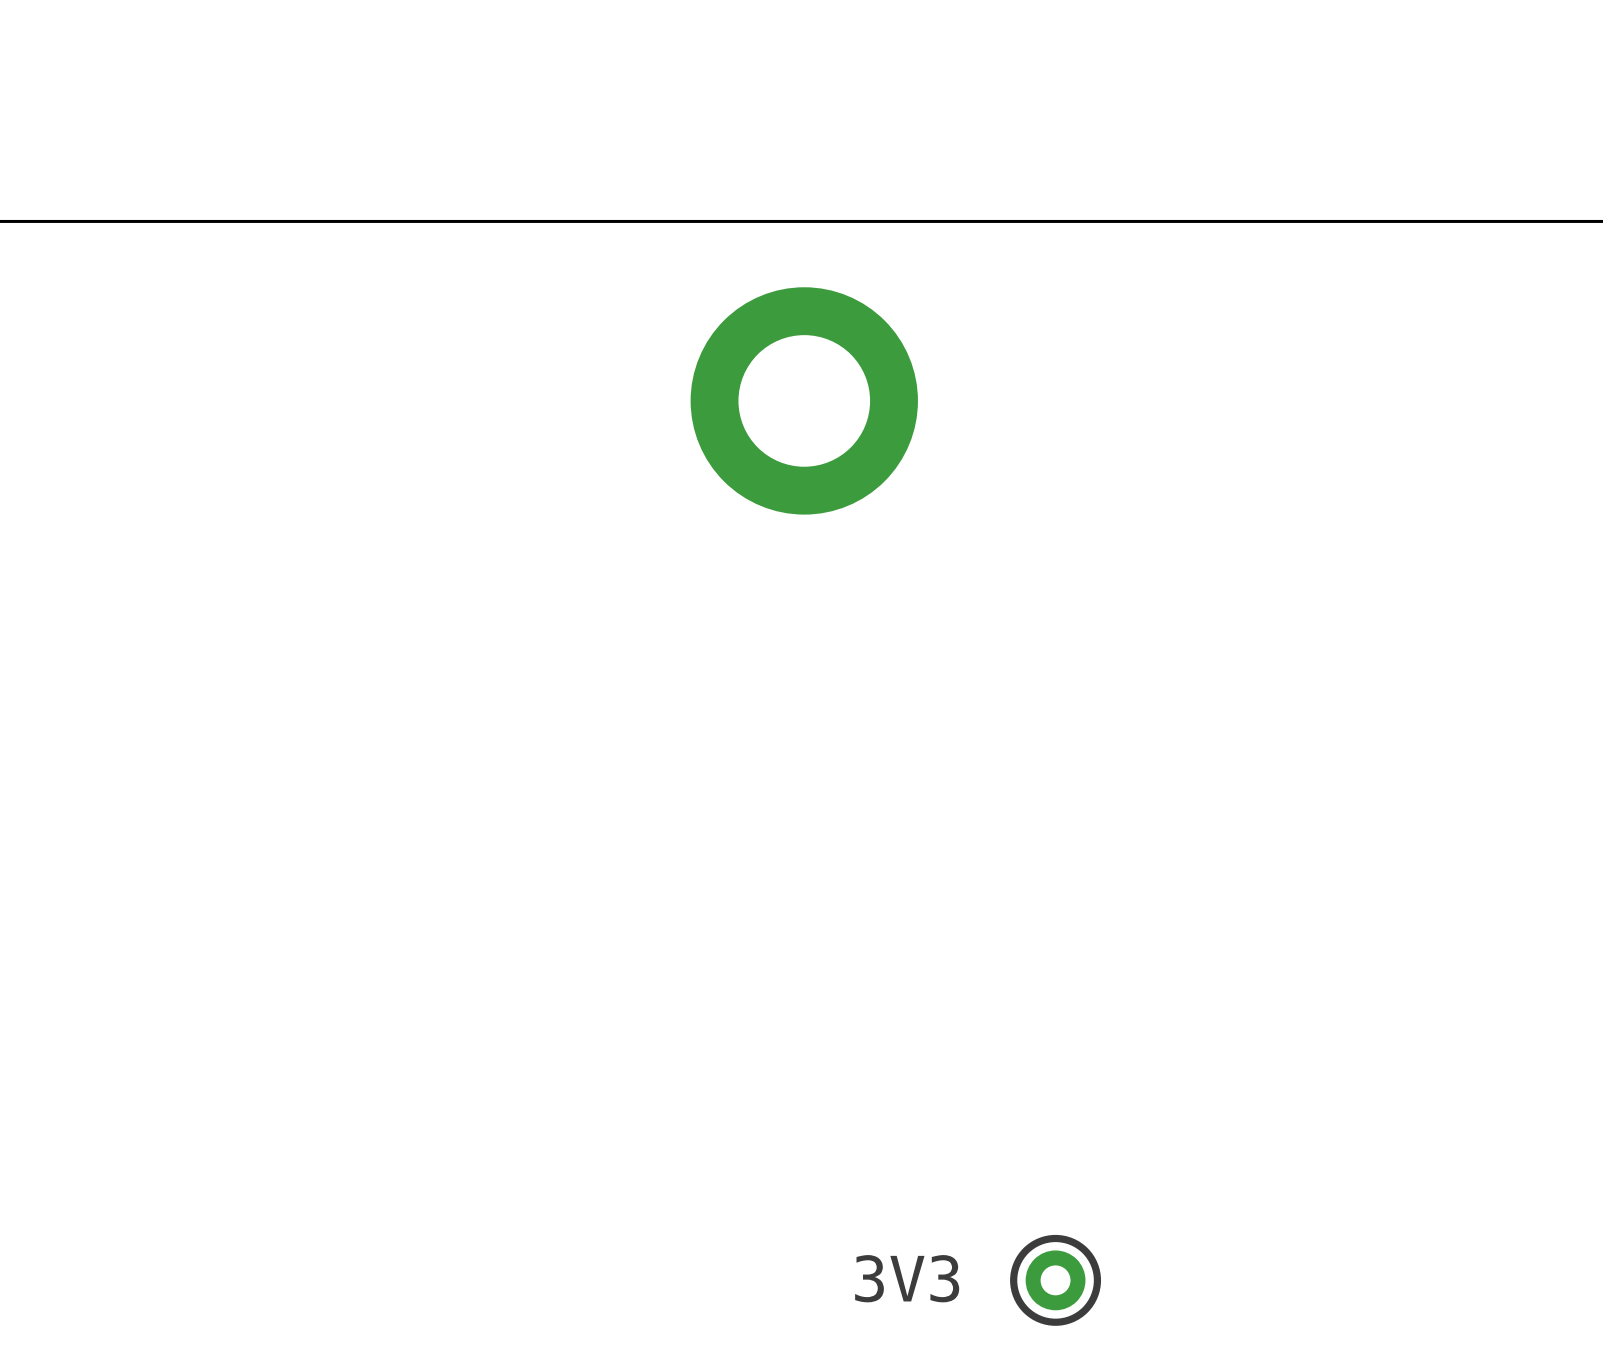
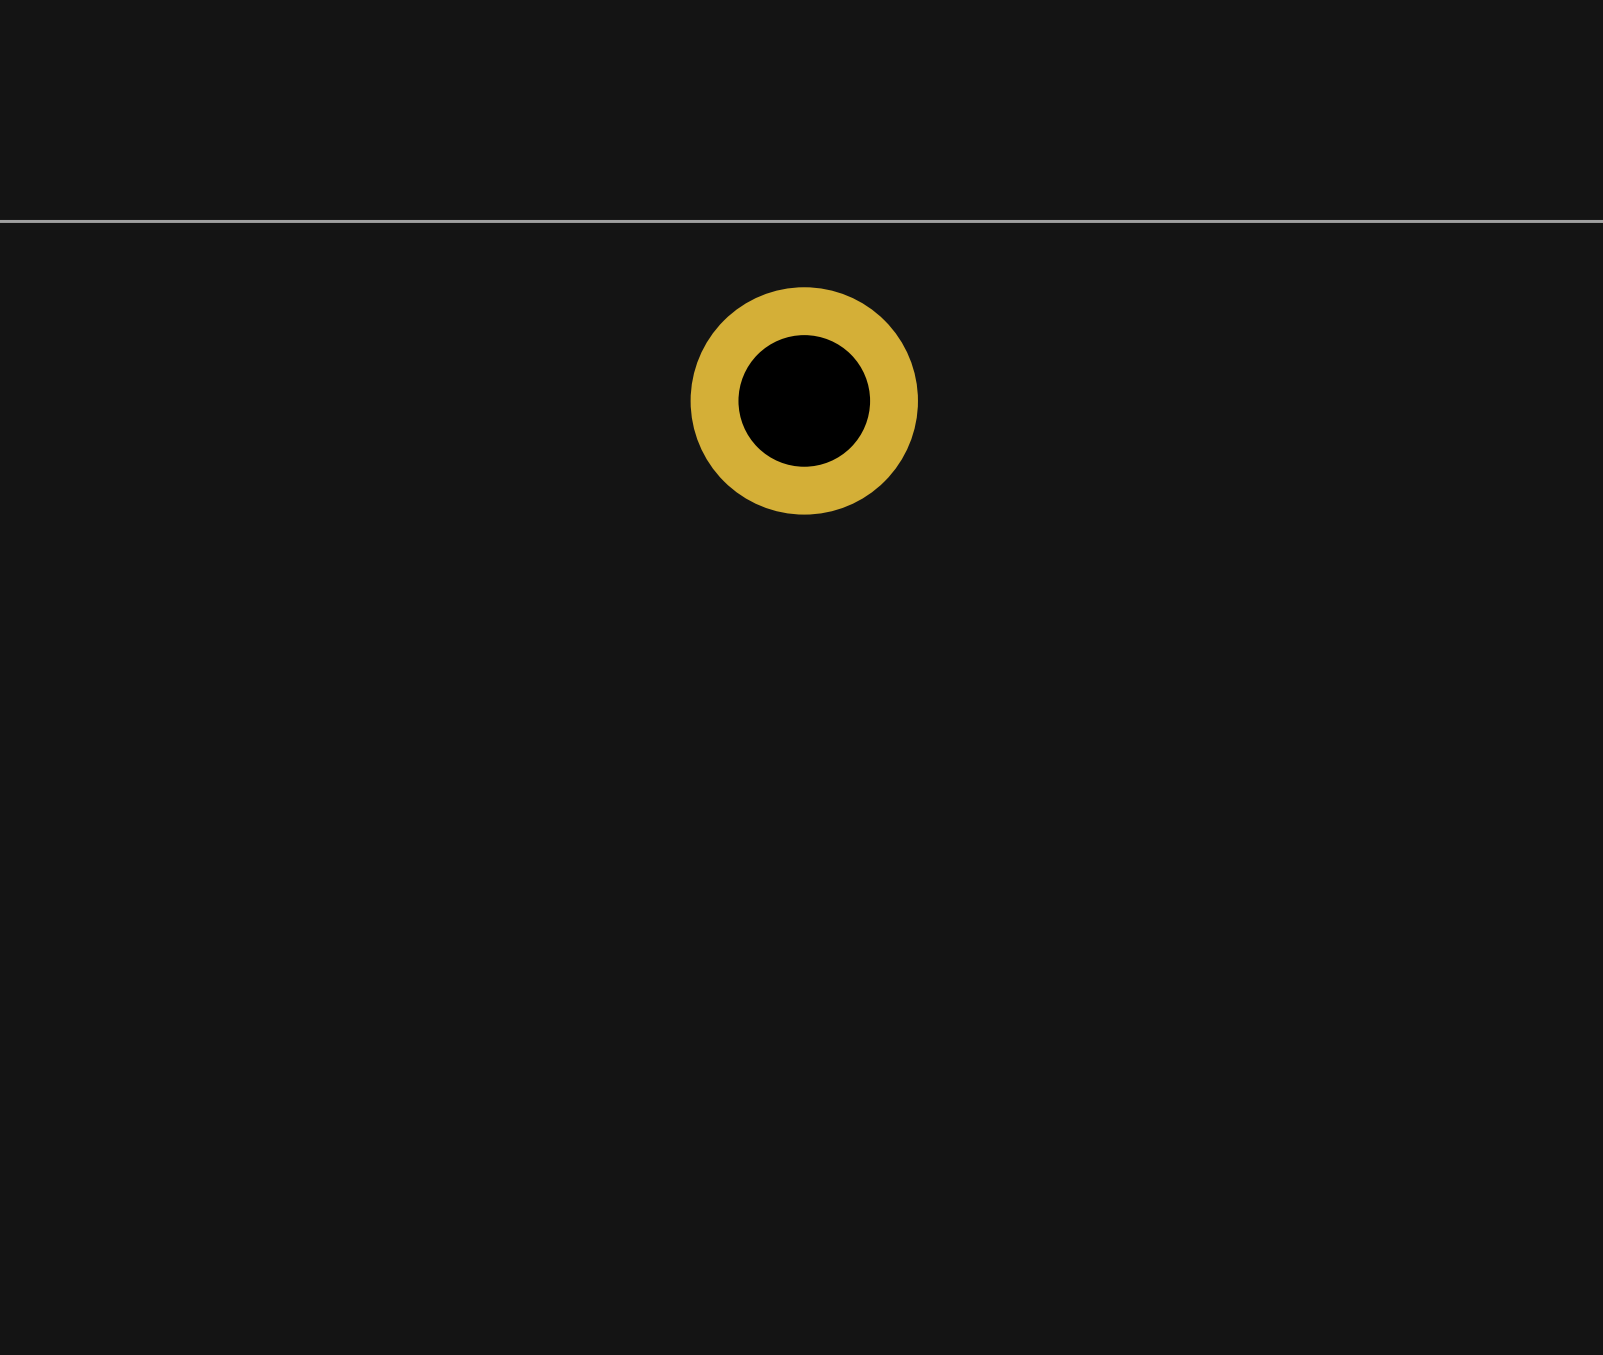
text: 3V3 (907, 1278) -> none
part: (1055, 1280) -> none

